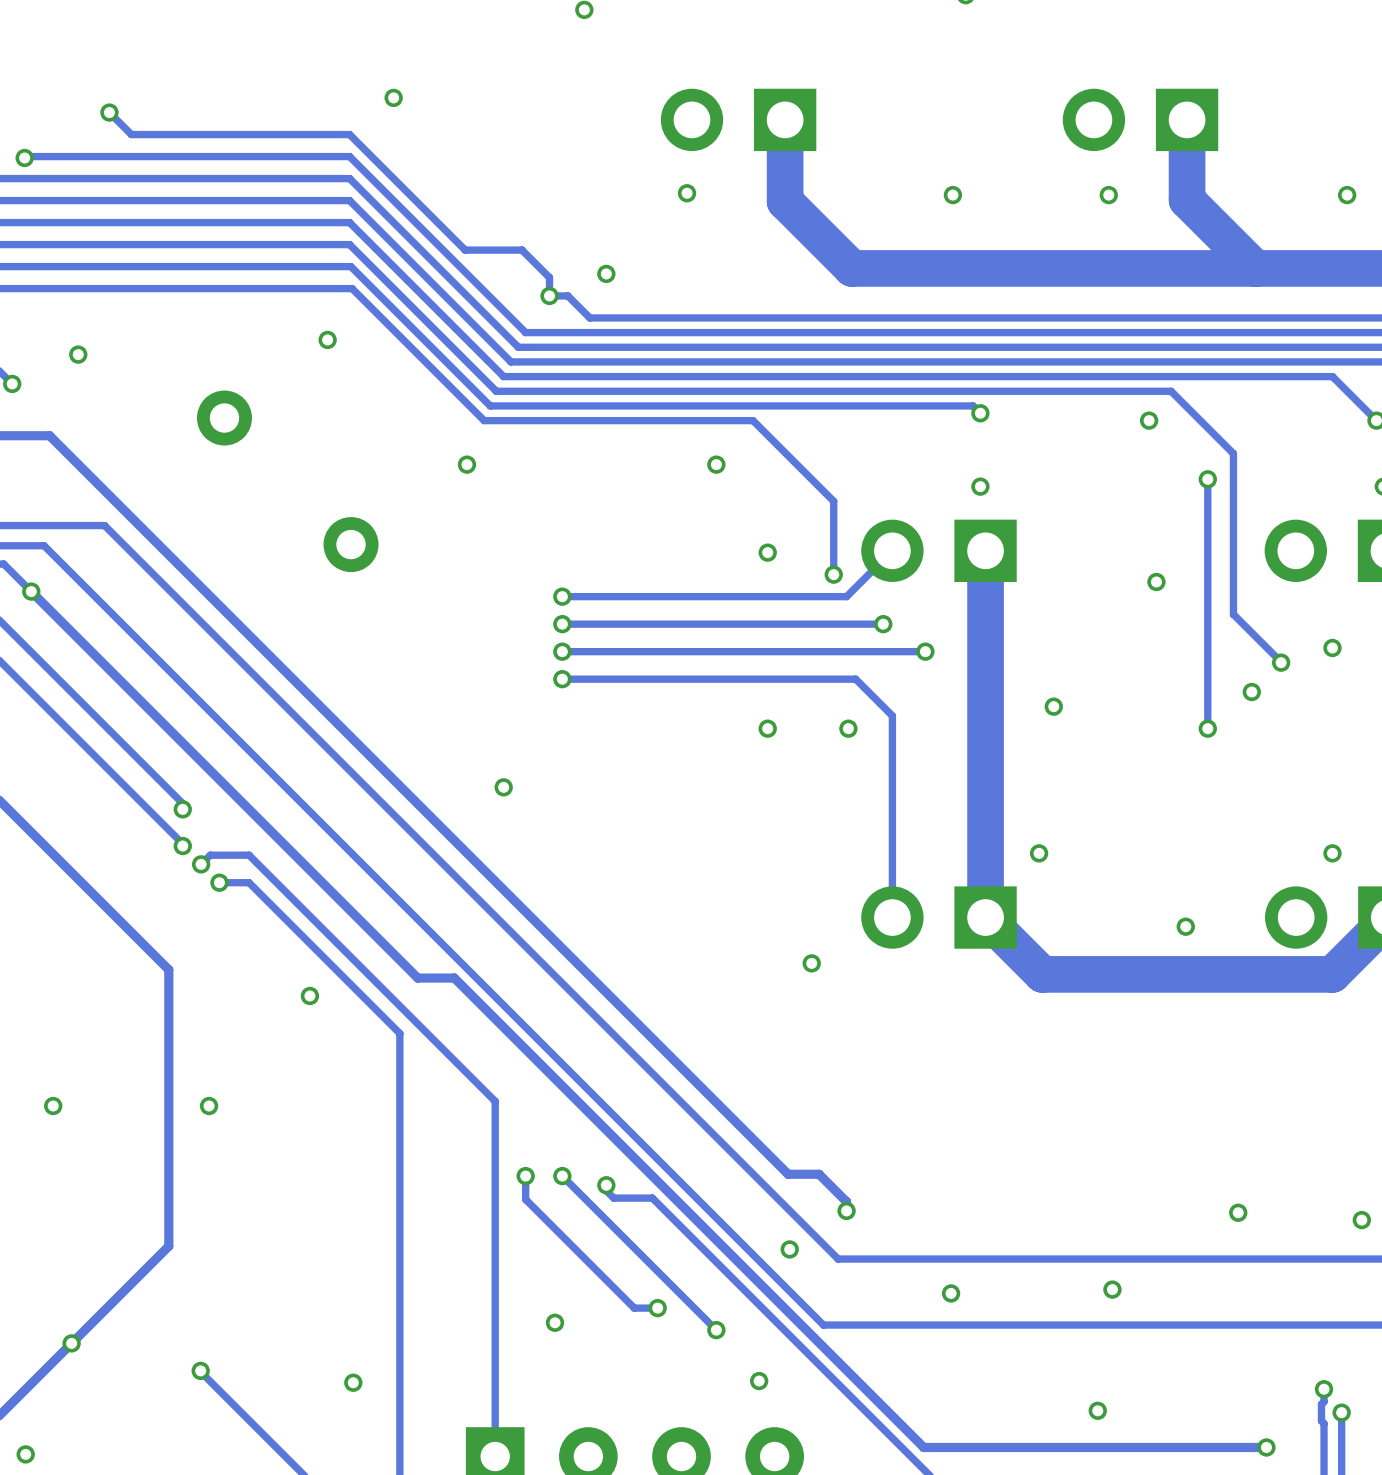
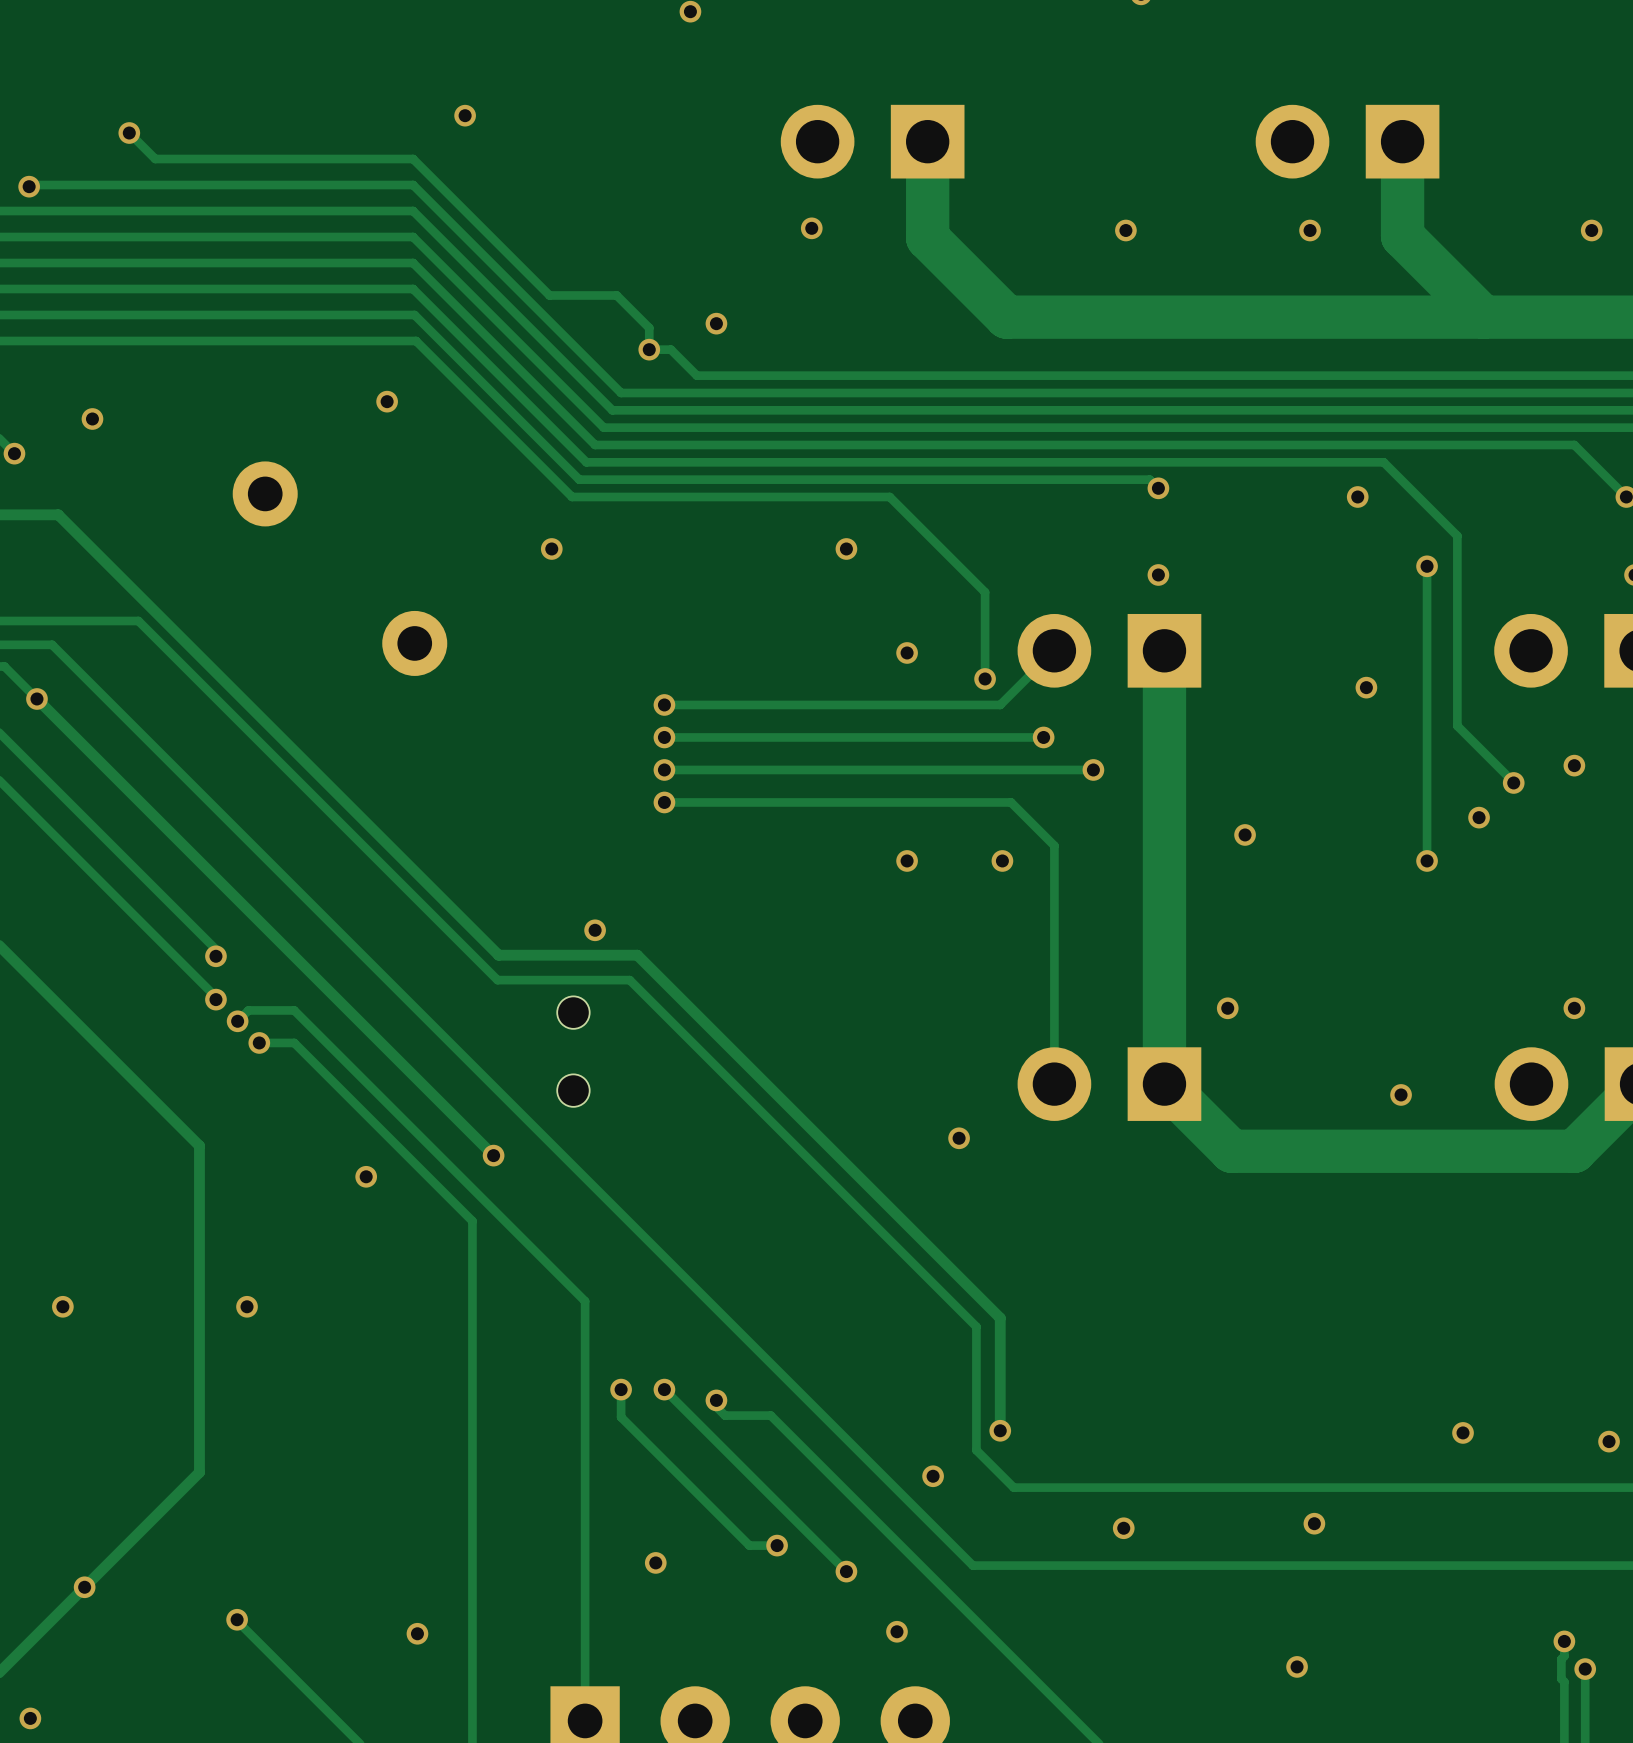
track: (49, 435) (788, 1174) (819, 1174) (846, 1201) -> (58, 514) (498, 955) (637, 955) (1000, 1318) (1000, 1419)
track: (104, 525) (838, 1259) (858, 1259) -> (123, 620) (138, 620) (497, 980) (629, 980) (976, 1326) (976, 1450) (1013, 1487)
part: none -> (573, 1051)
track: (417, 978) (454, 978) (923, 1447) (1266, 1447) -> none
via: none -> (493, 1155)
via: (1266, 1447) -> none

